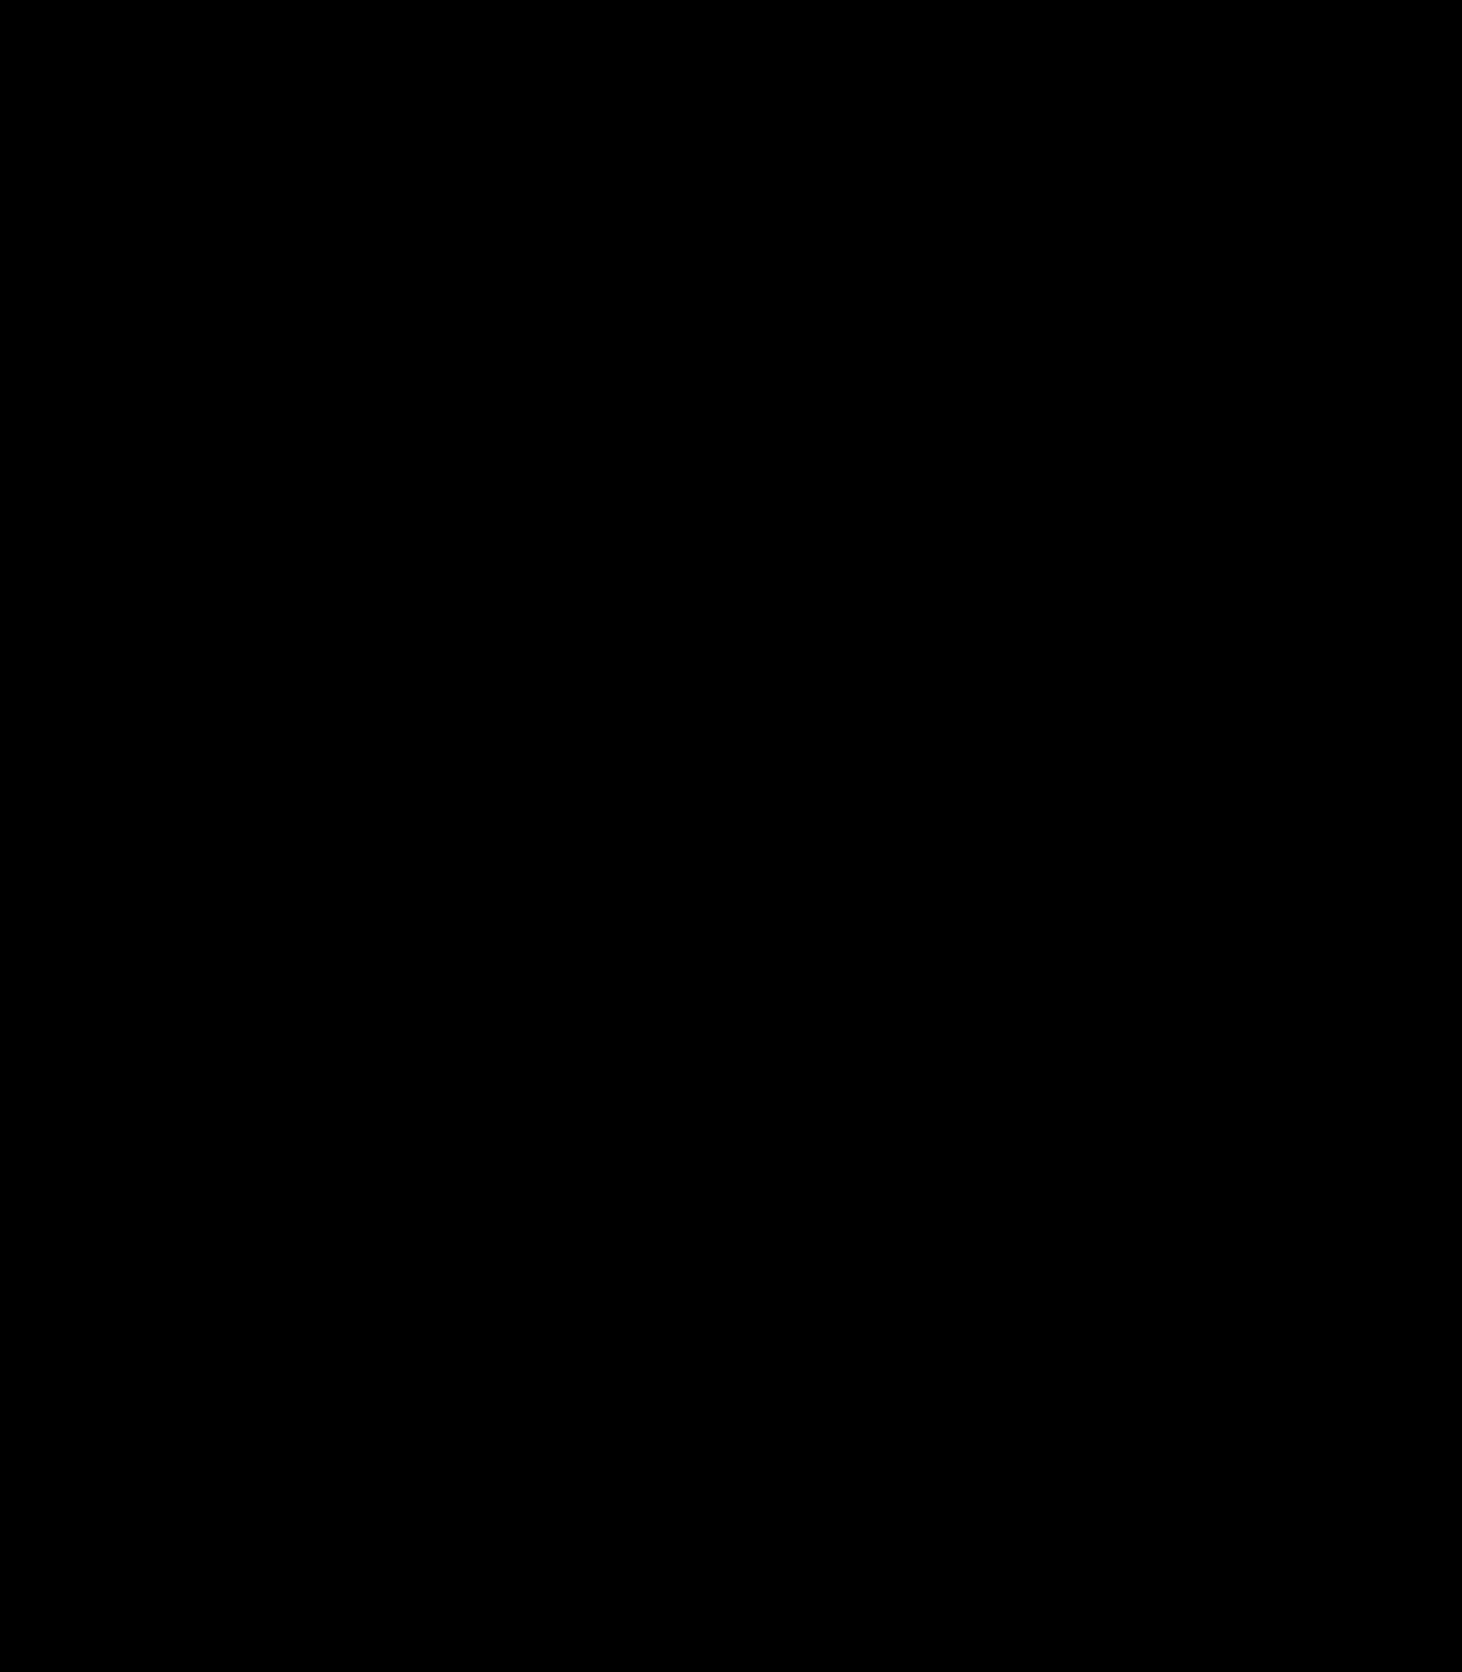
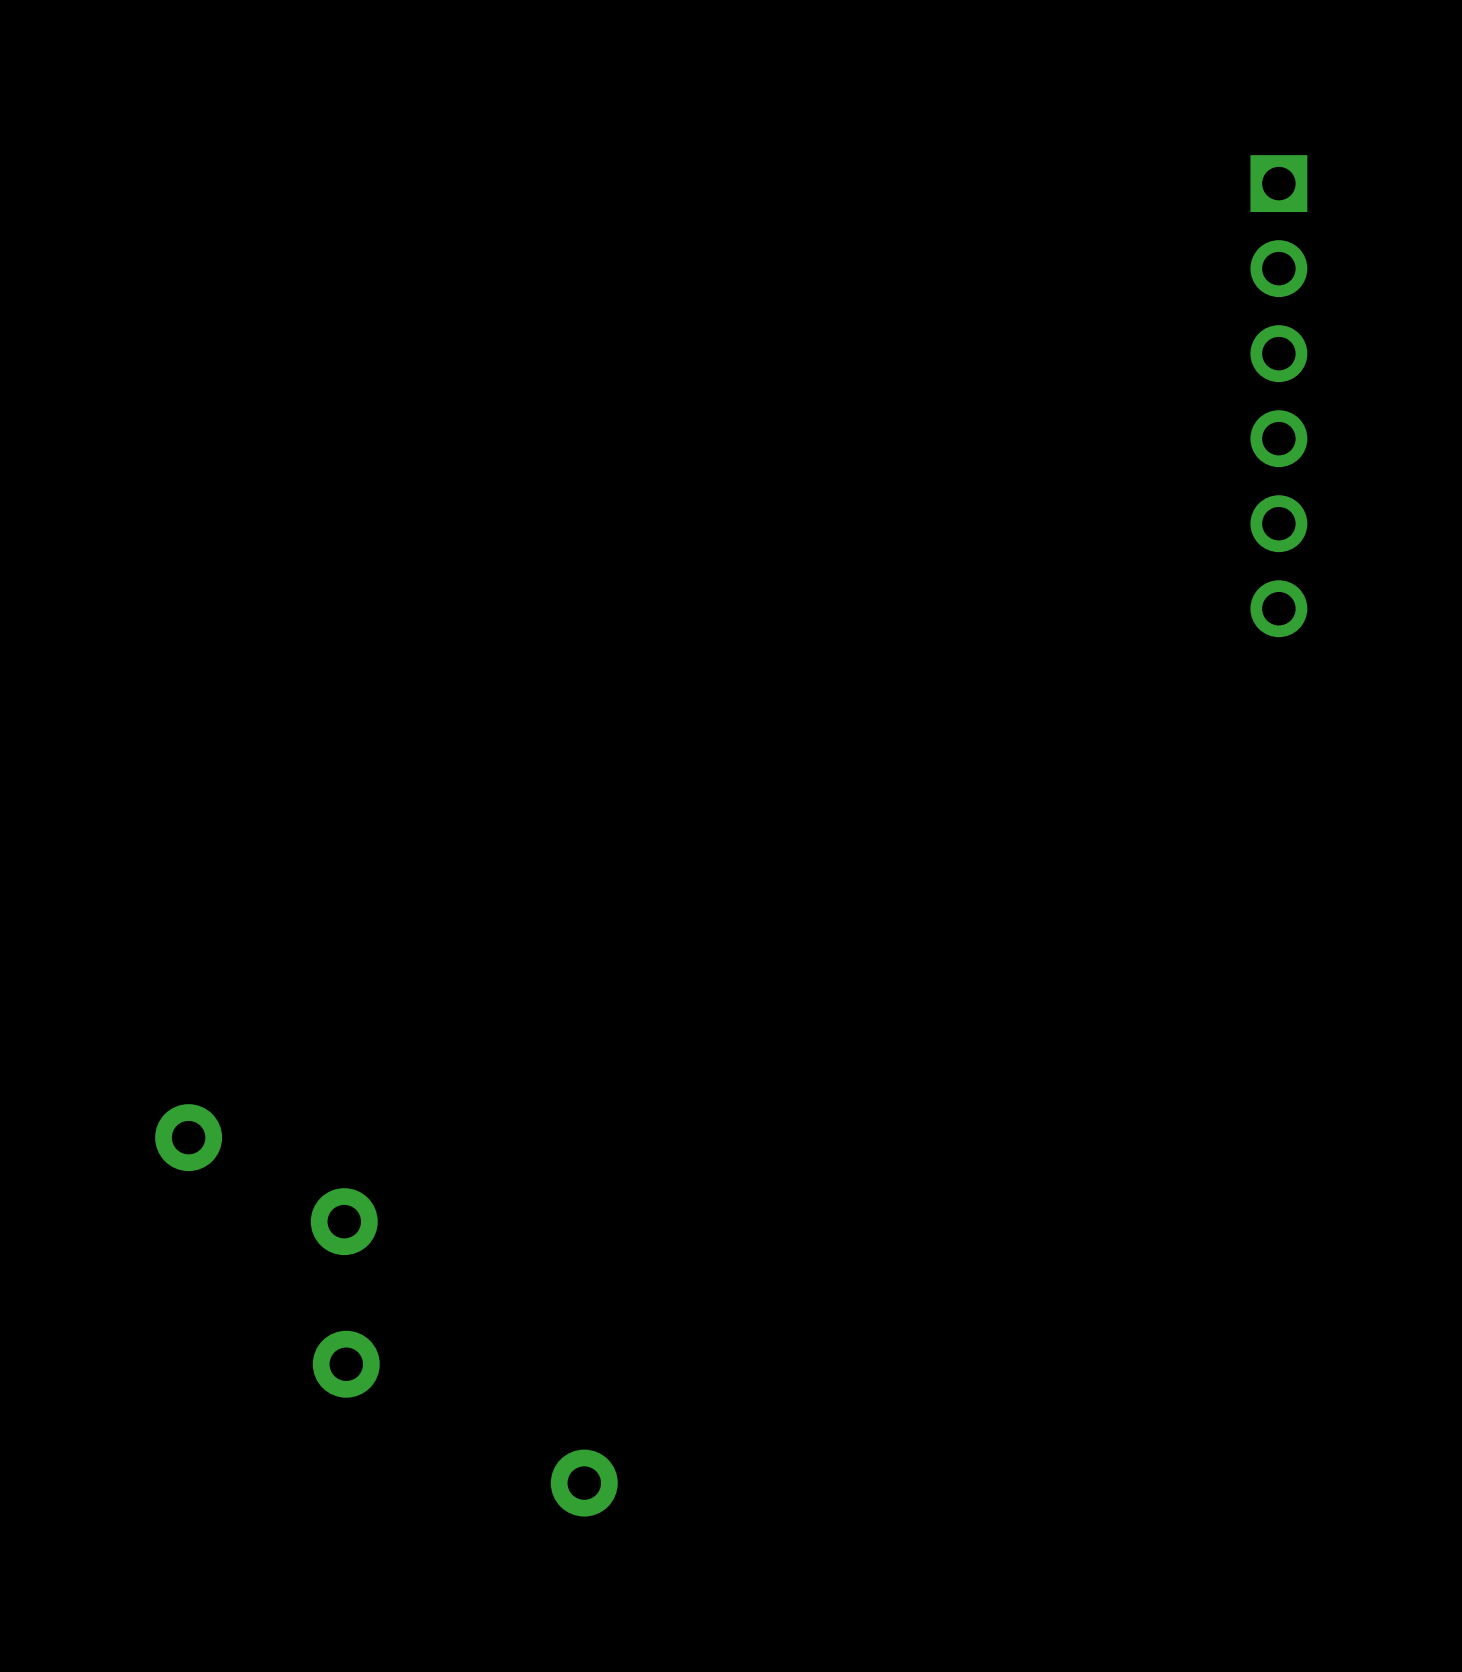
part: none -> (1278, 396)
part: none -> (188, 1137)
part: none -> (344, 1221)
part: none -> (346, 1364)
part: none -> (584, 1483)

